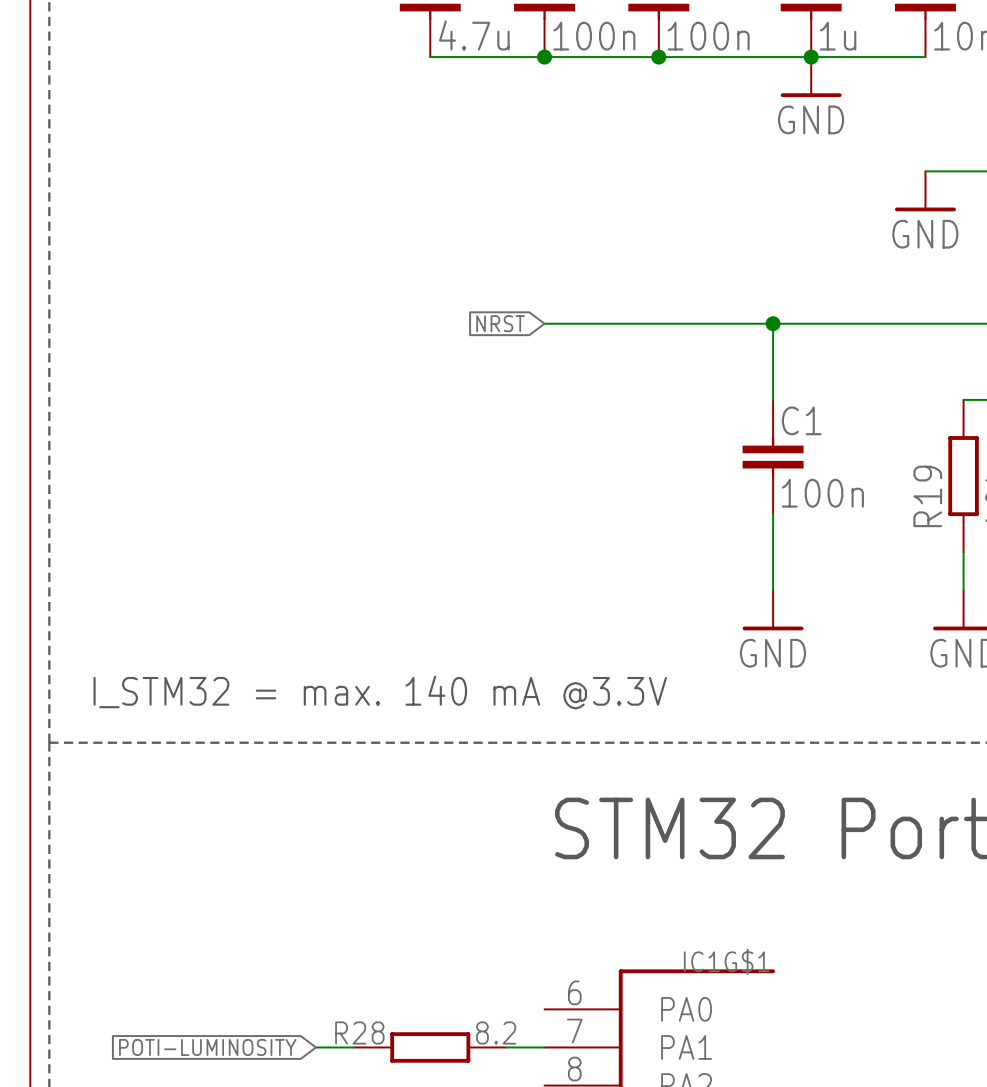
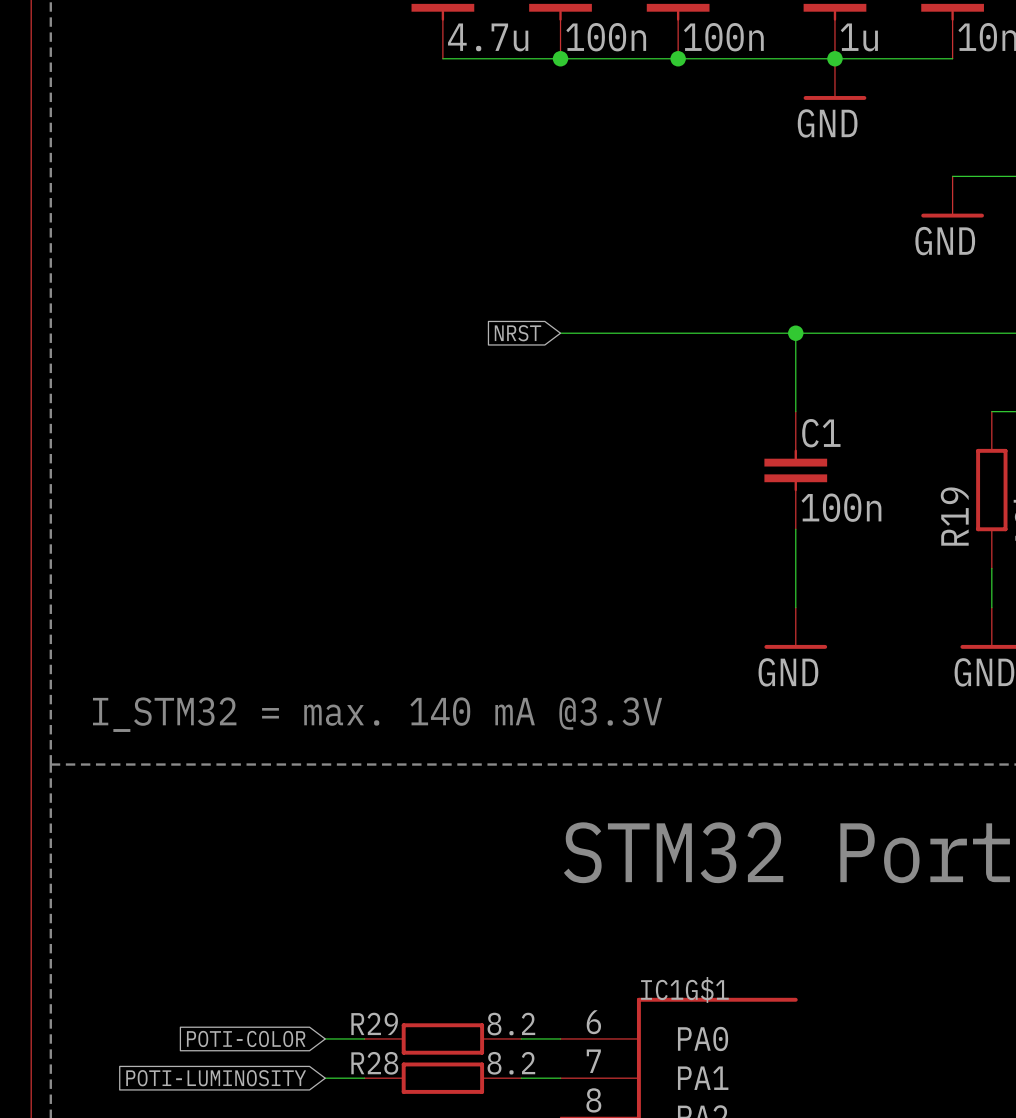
IC1G$1 name position: IC1G$1 (726, 961) -> IC1G$1 (684, 989)
global label: none -> POTI-COLOR (246, 1038)
wire: none -> (325, 1038) (364, 1038)
R29: none -> 8.2 (442, 1038)
wire: none -> (521, 1038) (560, 1038)

